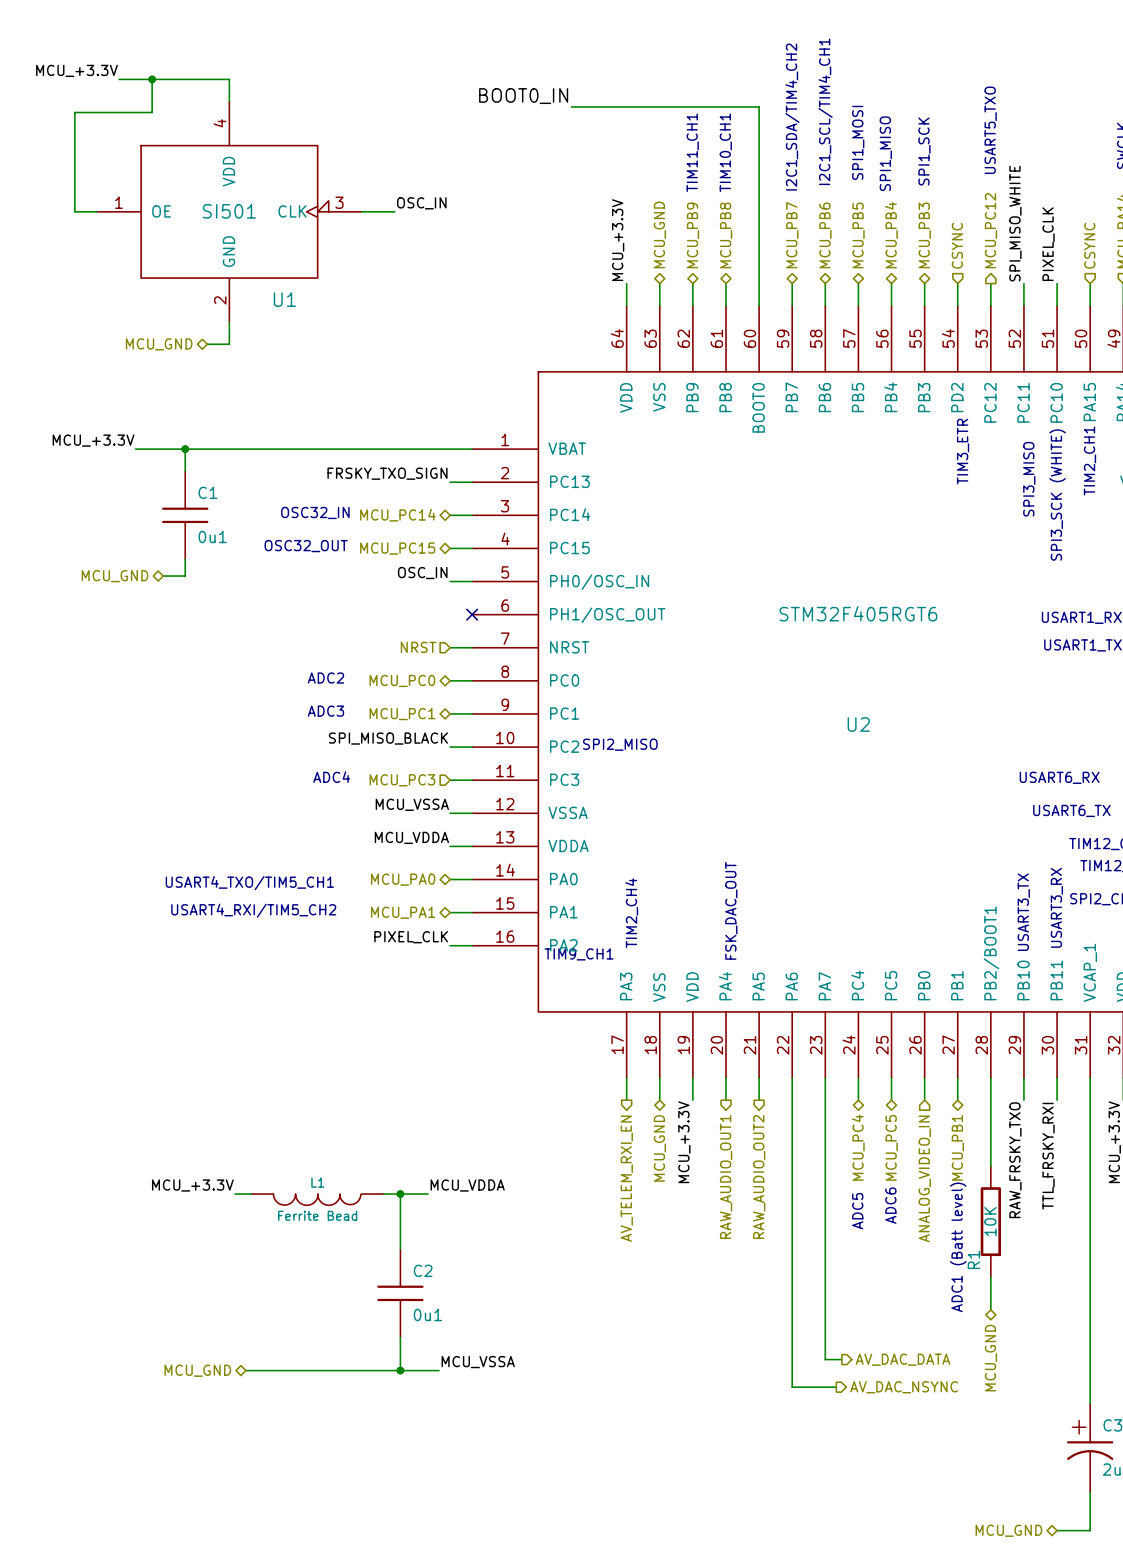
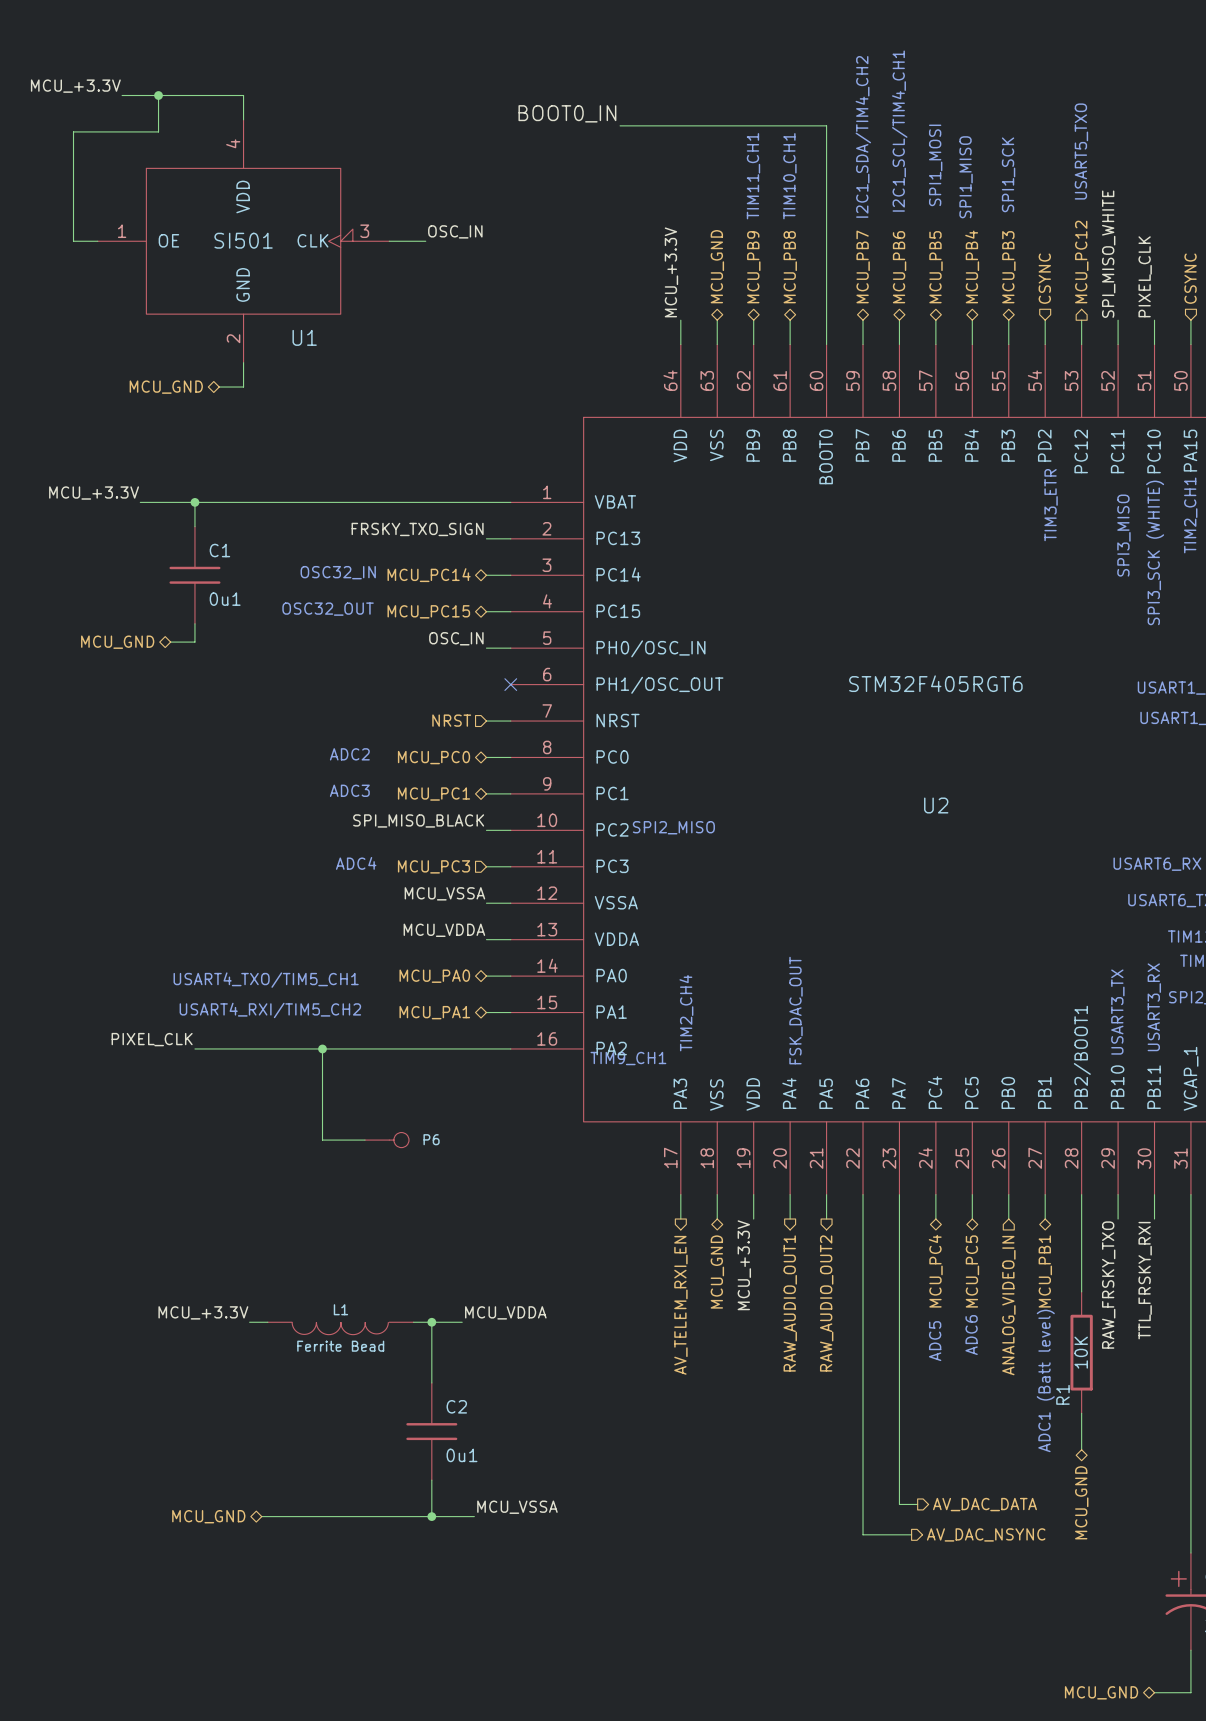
label: none -> PIXEL_CLK (152, 1039)
label: PIXEL_CLK (411, 937) -> none
wire: none -> (194, 1048) (486, 1048)
wire: none -> (322, 1048) (322, 1140) (365, 1140)
junction: none -> (322, 1048)
P6: none -> (387, 1140)

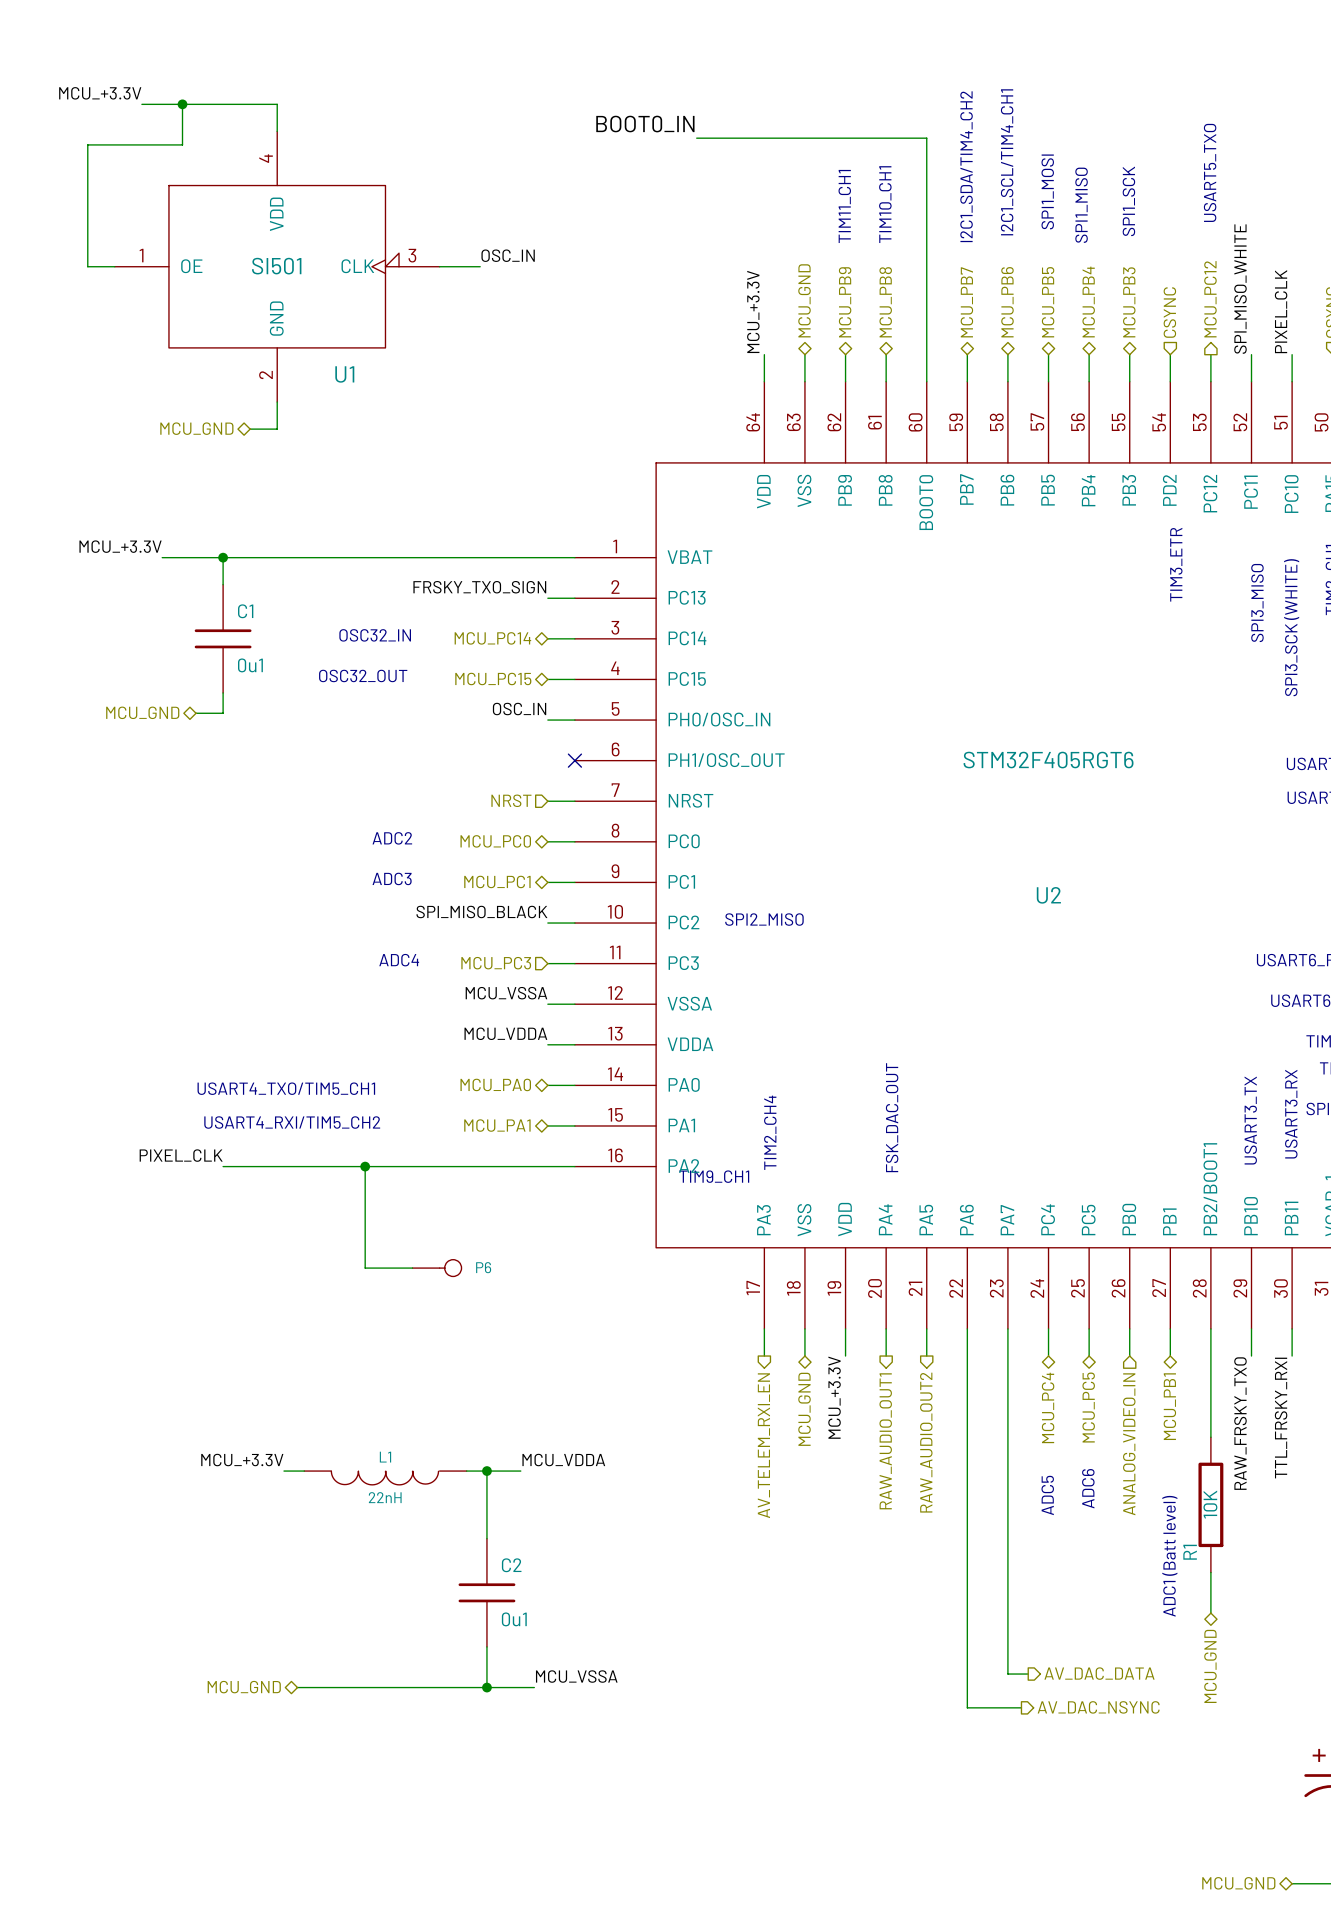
L1 value: Ferrite Bead (340, 1346) -> 22nH (385, 1497)

